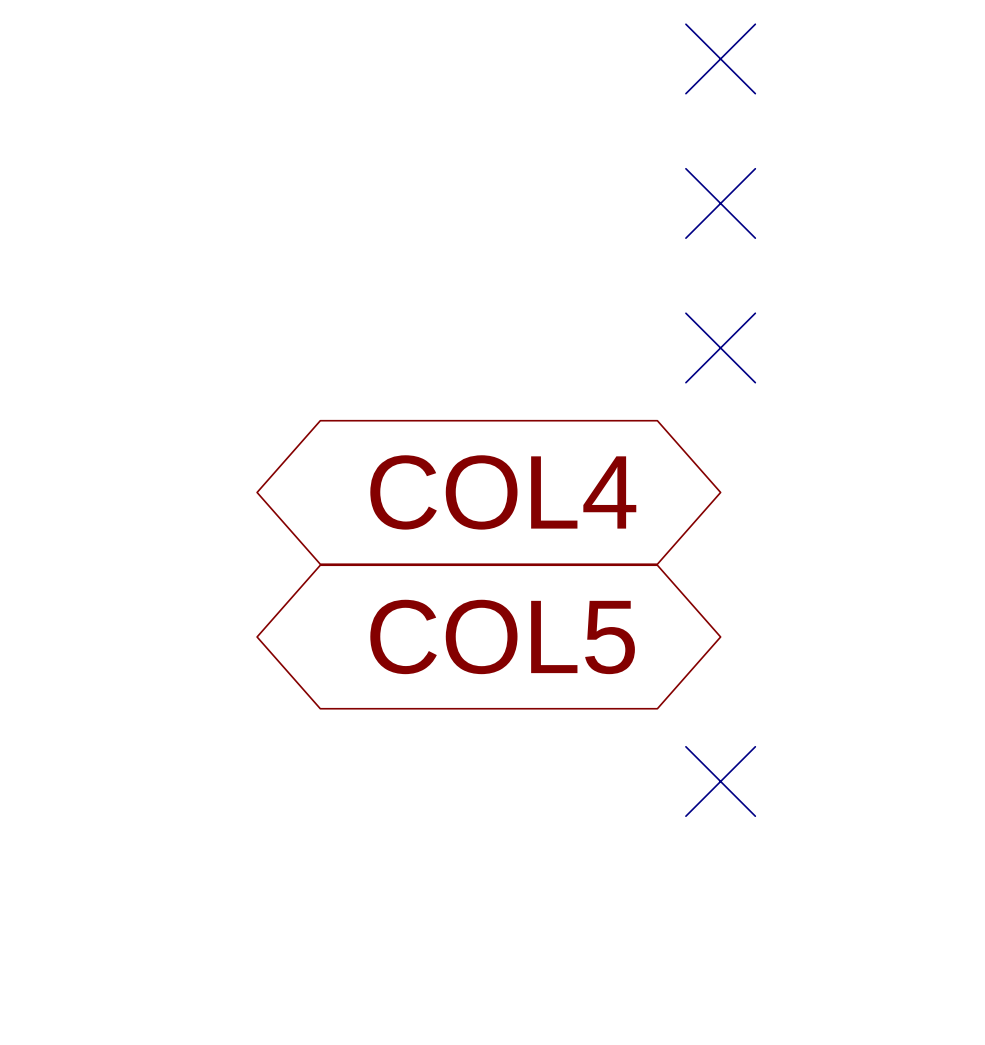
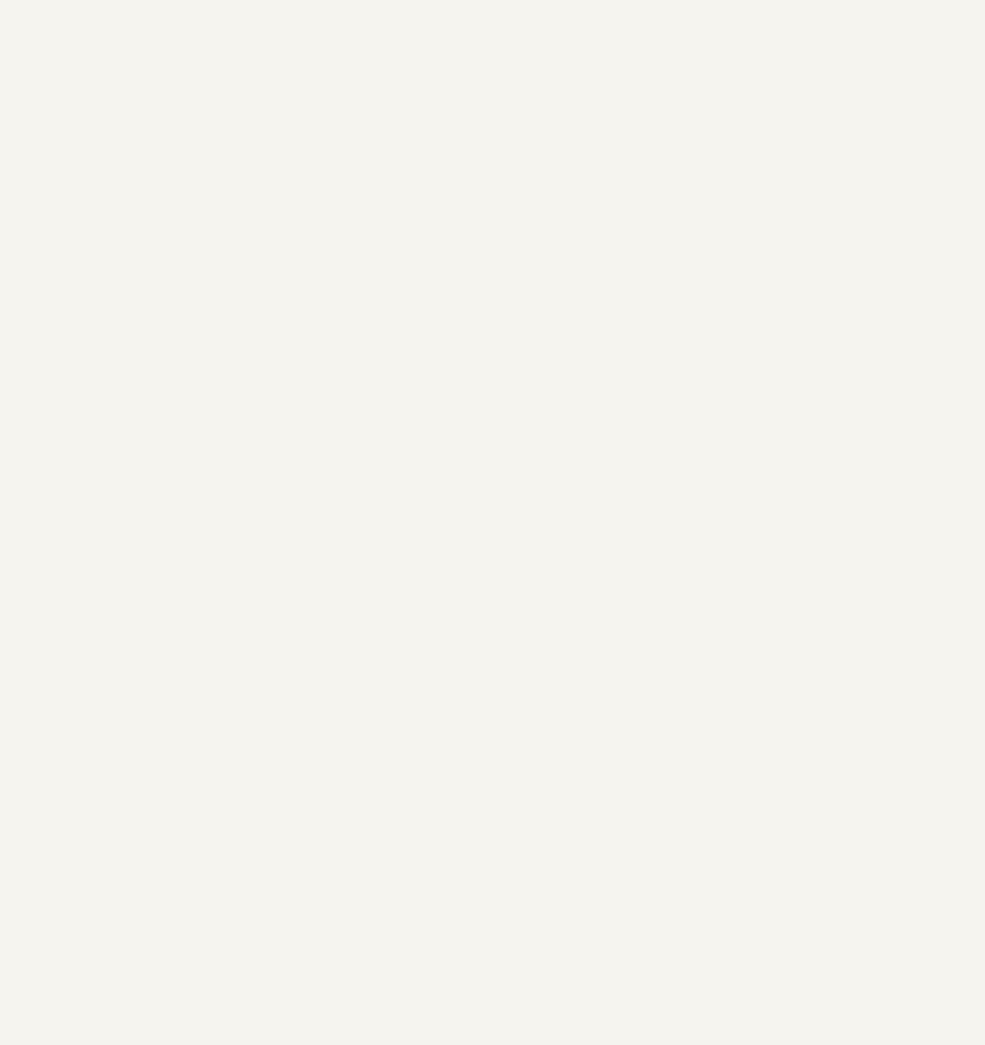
no-connect mark: (720, 58) -> none
no-connect mark: (720, 203) -> none
no-connect mark: (720, 347) -> none
global label: COL4 (503, 492) -> none
global label: COL5 (502, 636) -> none
no-connect mark: (720, 781) -> none

